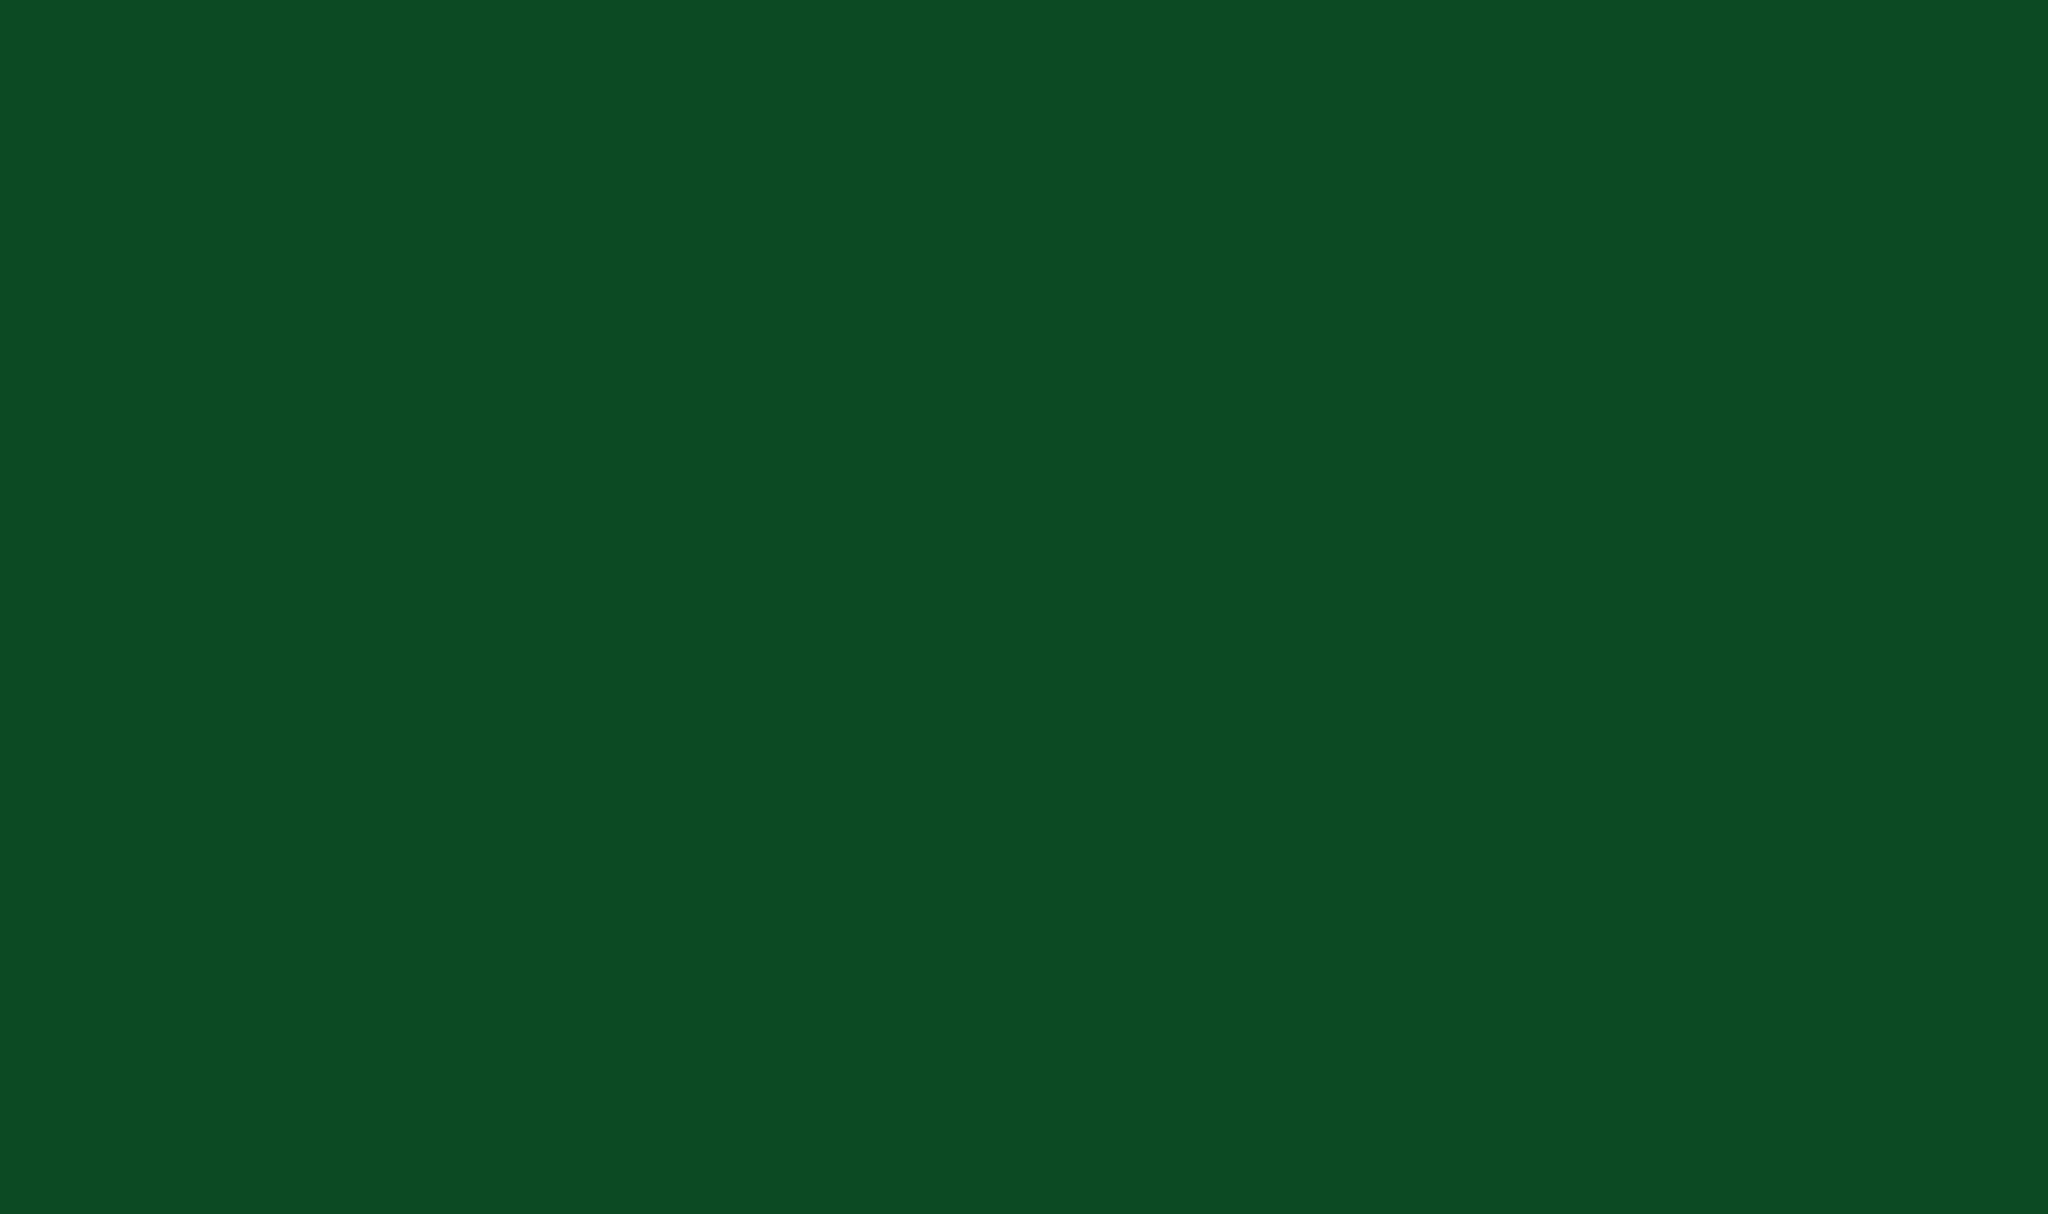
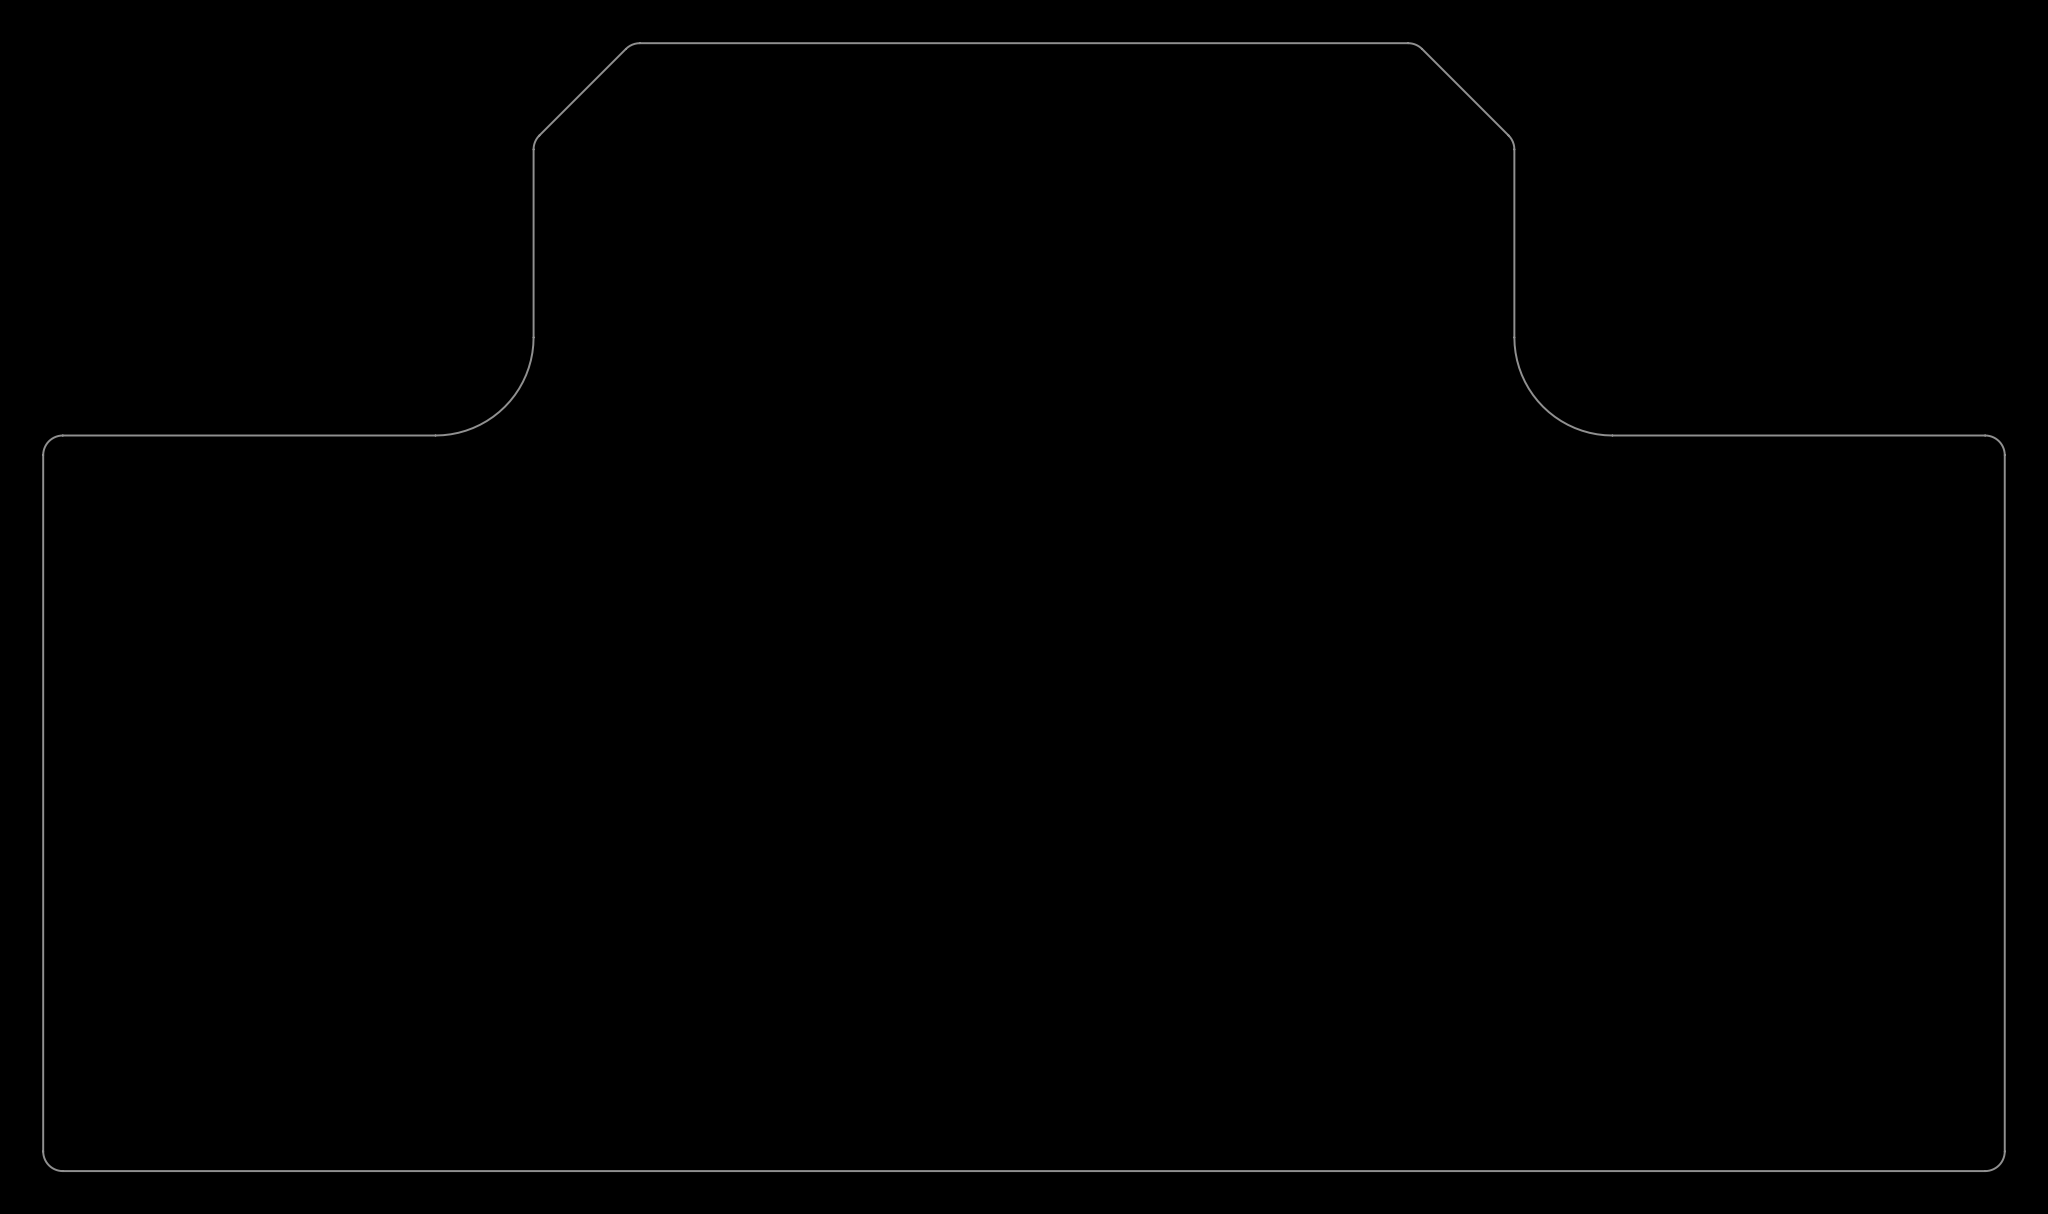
line: none -> (639, 43) (1413, 44) (1422, 48) (1512, 141) (1515, 352) (1519, 367) (1528, 388) (1537, 401) (1554, 416) (1582, 430) (1604, 435) (1985, 435) (1997, 439) (2002, 446) (2004, 455) (2004, 1151) (2000, 1163) (1993, 1169) (1985, 1171) (62, 1171) (50, 1166) (45, 1159) (43, 1151) (43, 455) (45, 446) (52, 438) (62, 435) (443, 435) (473, 428) (493, 416) (504, 406) (519, 388) (528, 367) (532, 352) (535, 141) (625, 48) (639, 43)

